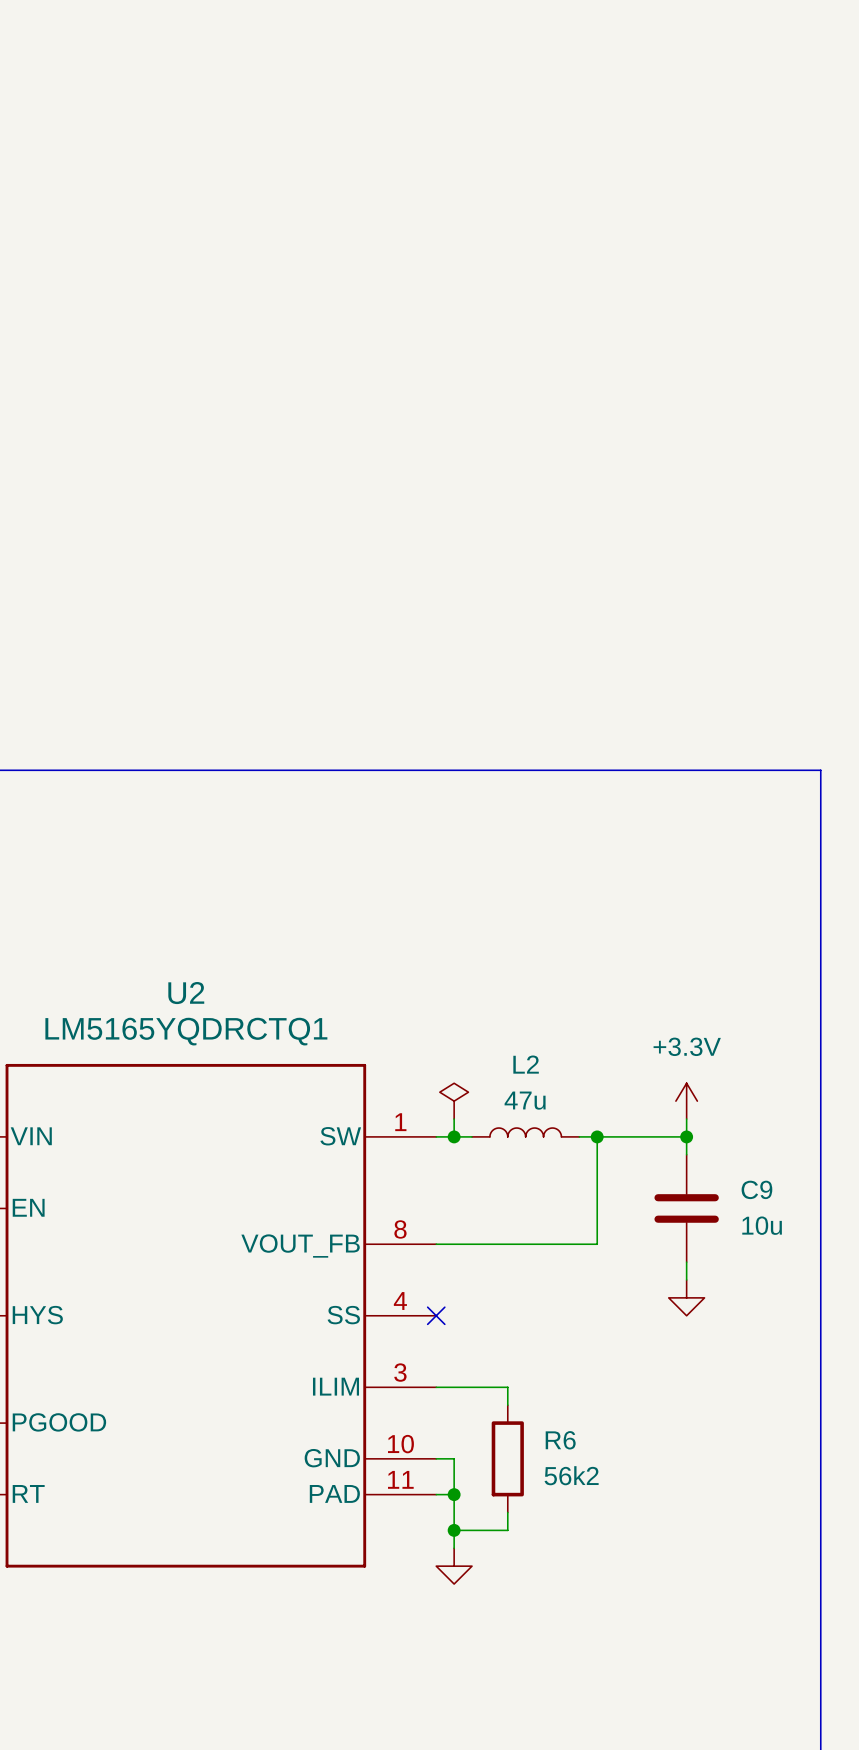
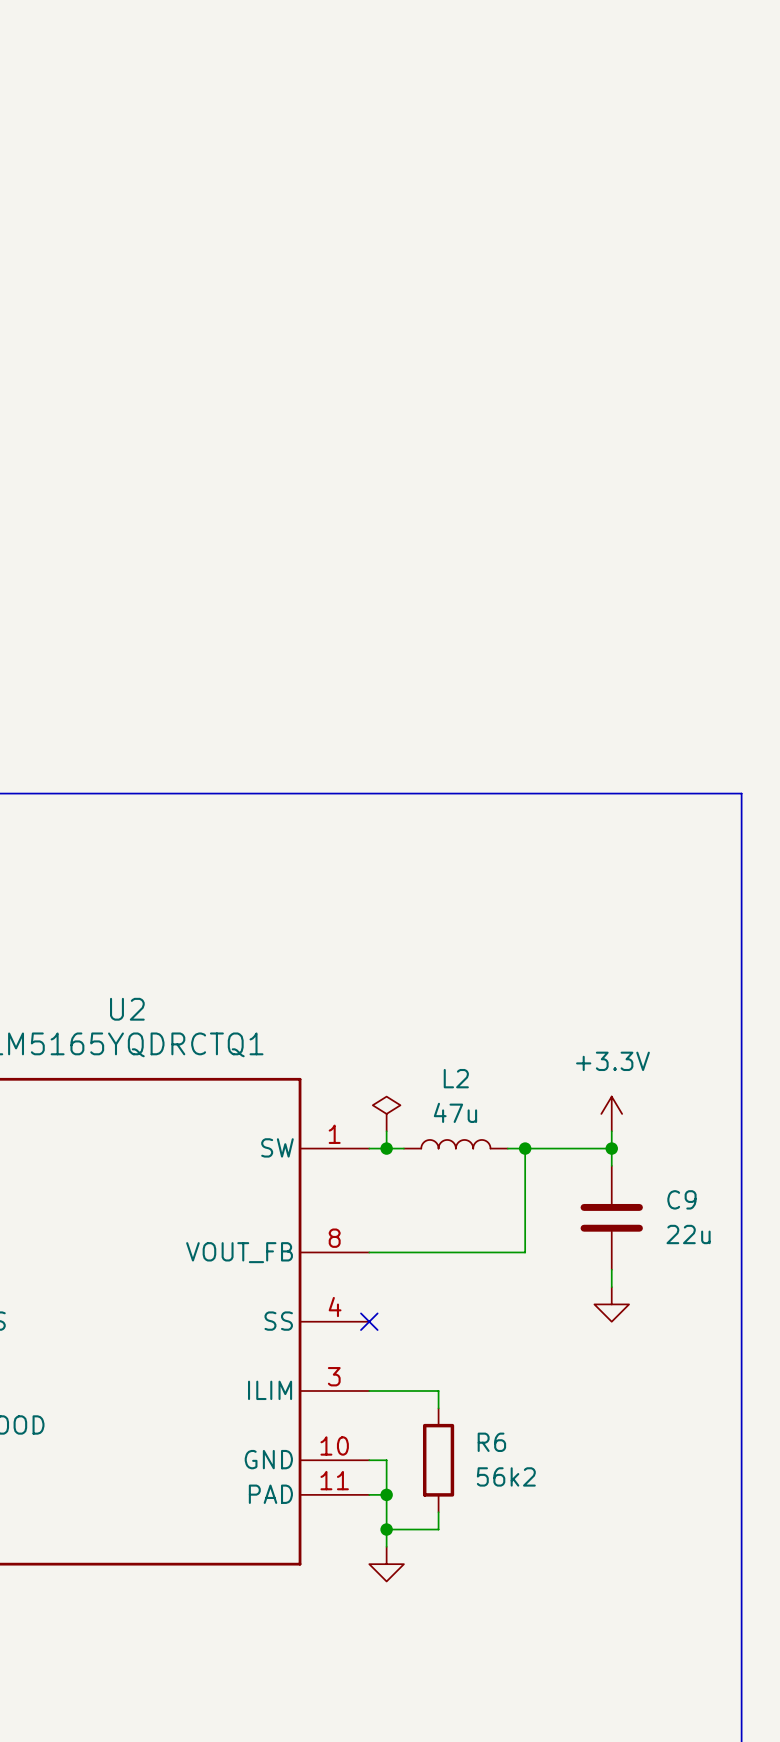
C9 value: 10u (762, 1225) -> 22u (688, 1234)

